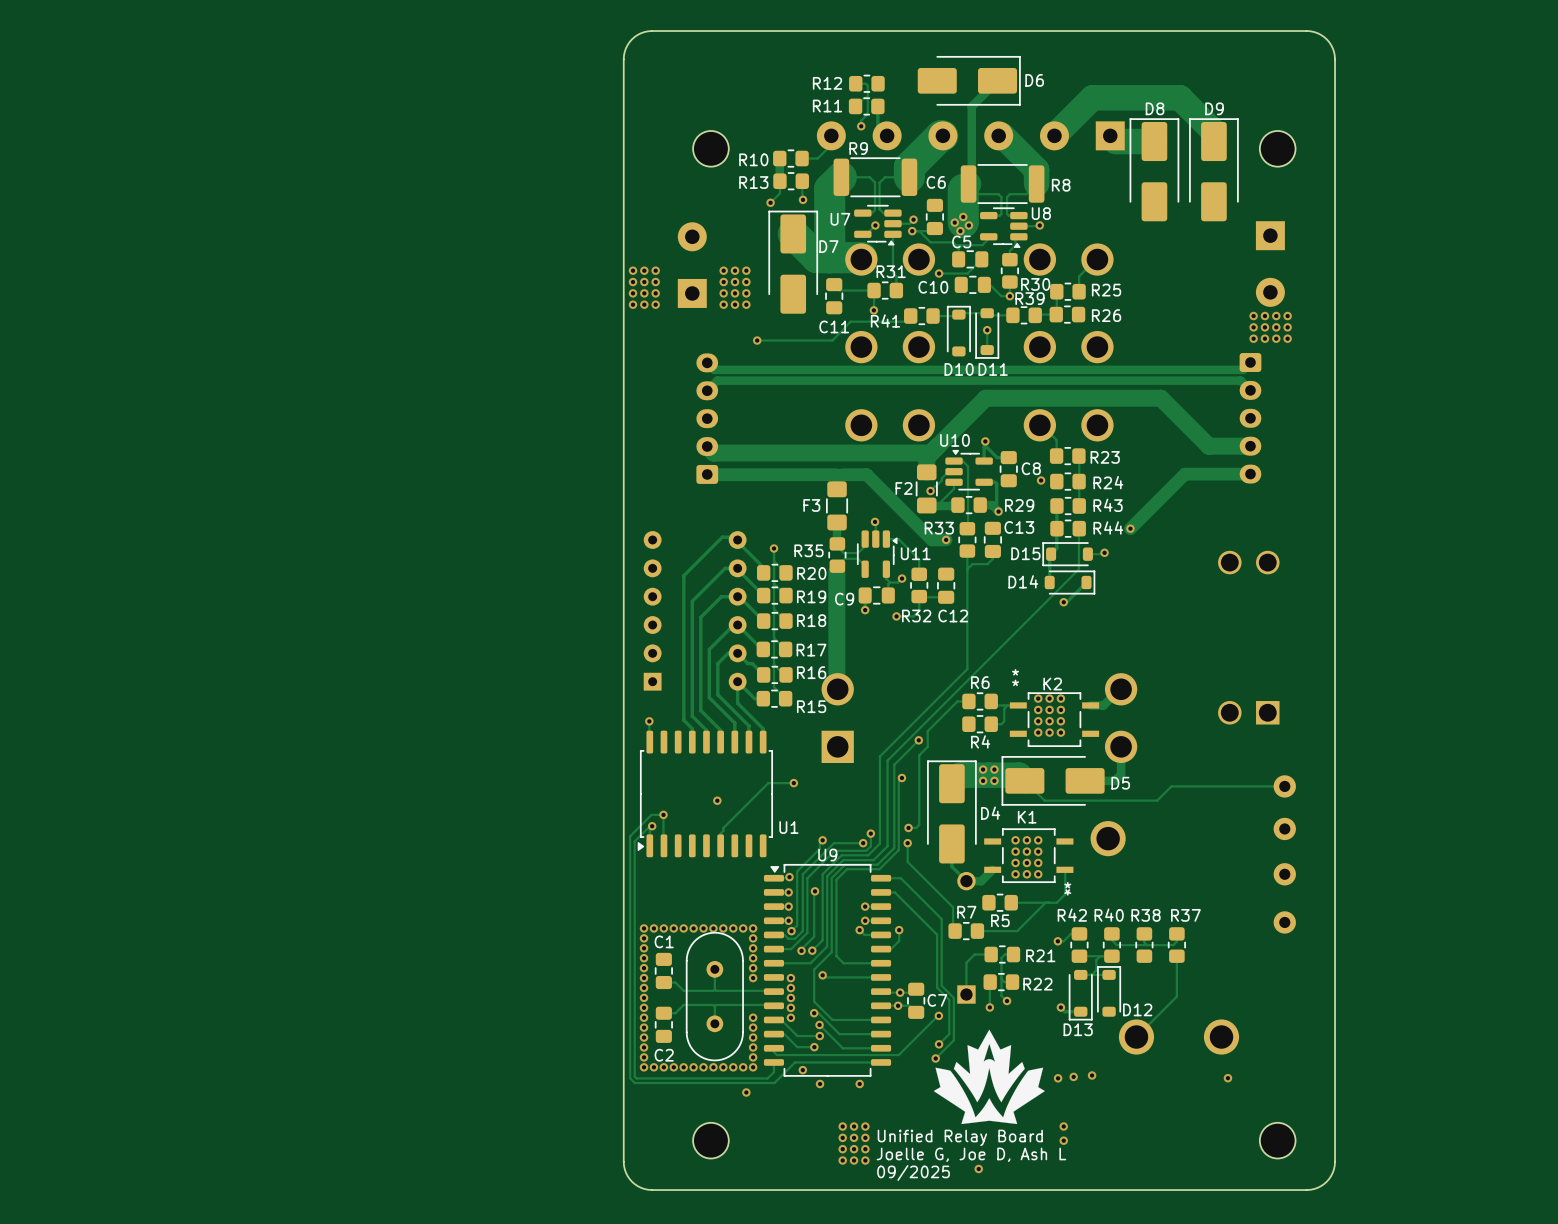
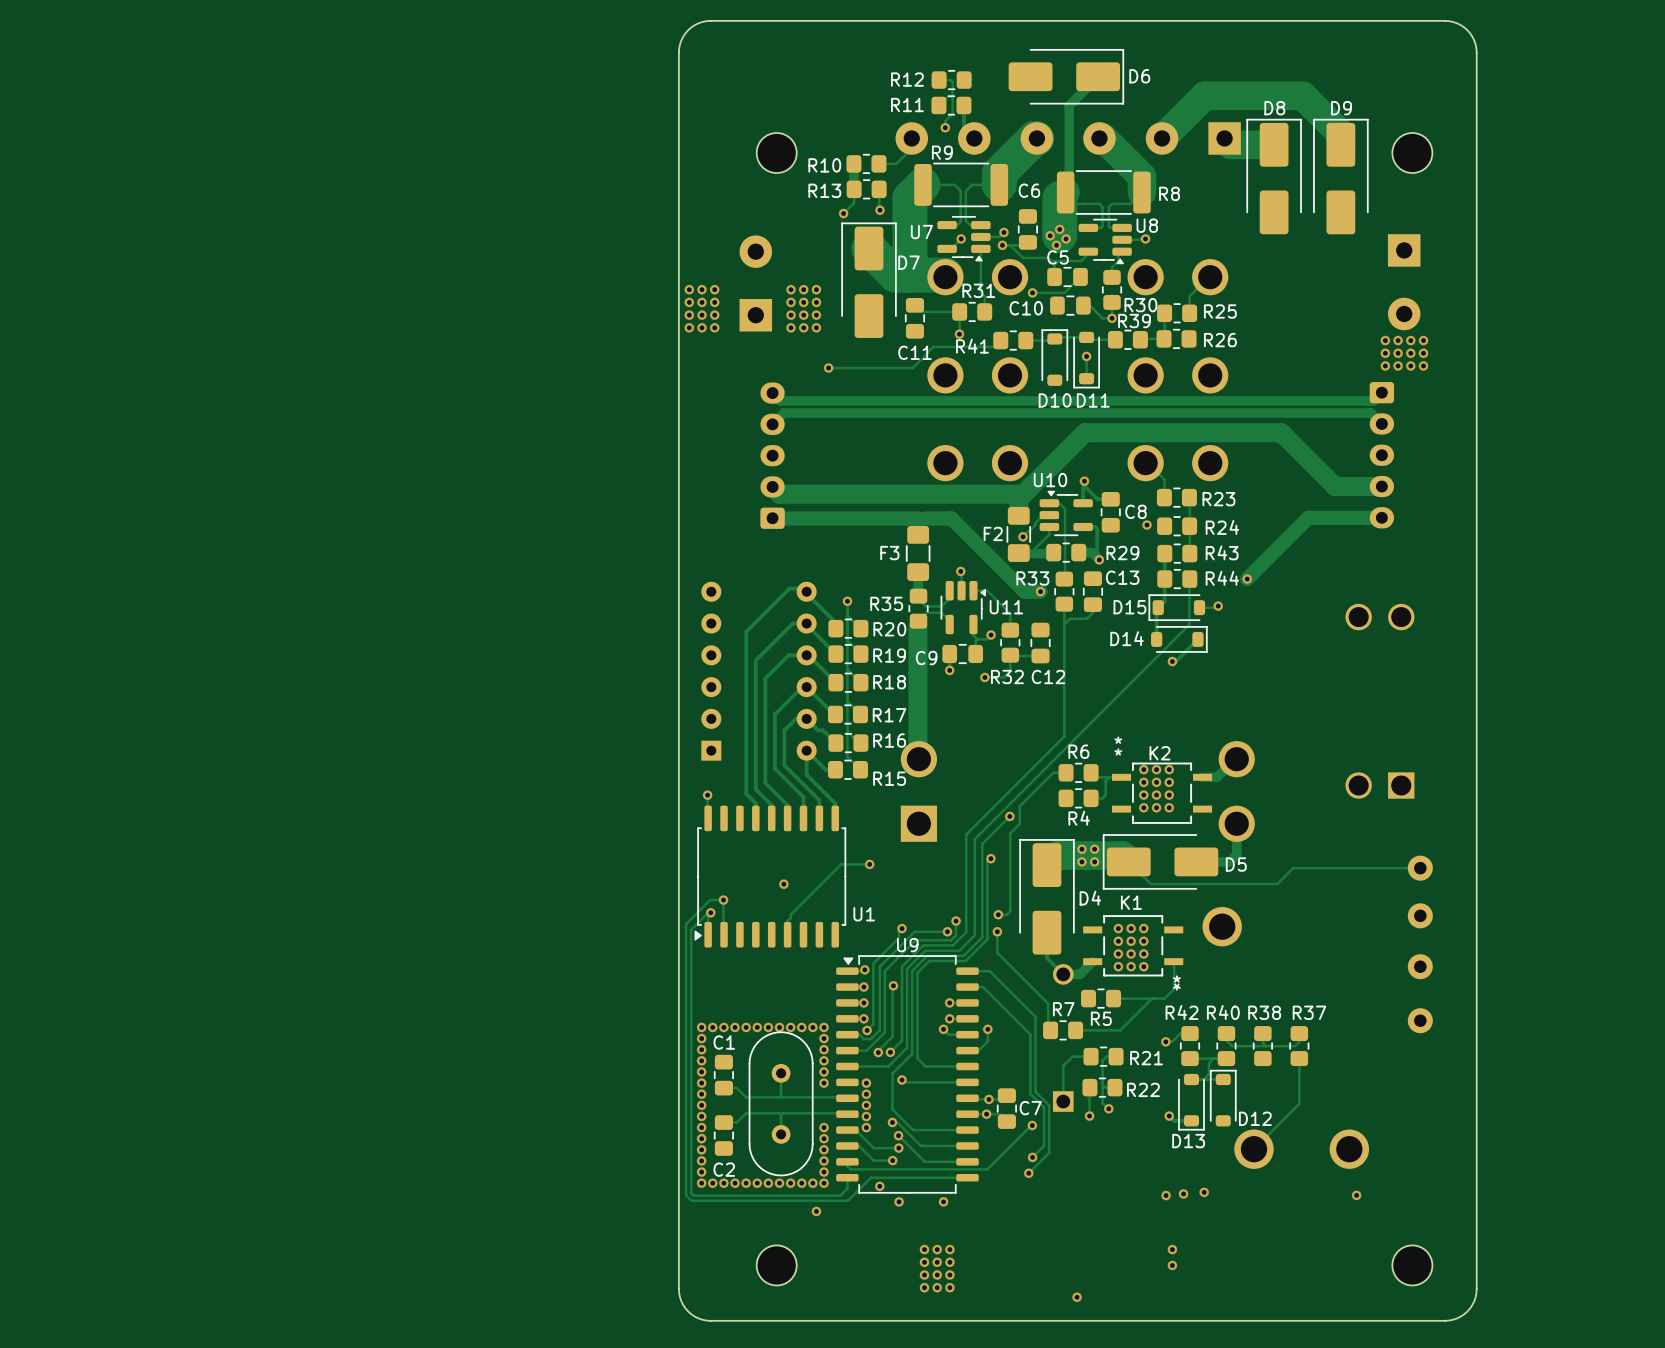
drawing: [933, 1029, 1045, 1125] -> none
text: Unified Relay Board (960, 1137) -> none
text: Joelle G, Joe D, Ash L (971, 1154) -> none
text: 09/2025 (913, 1172) -> none

